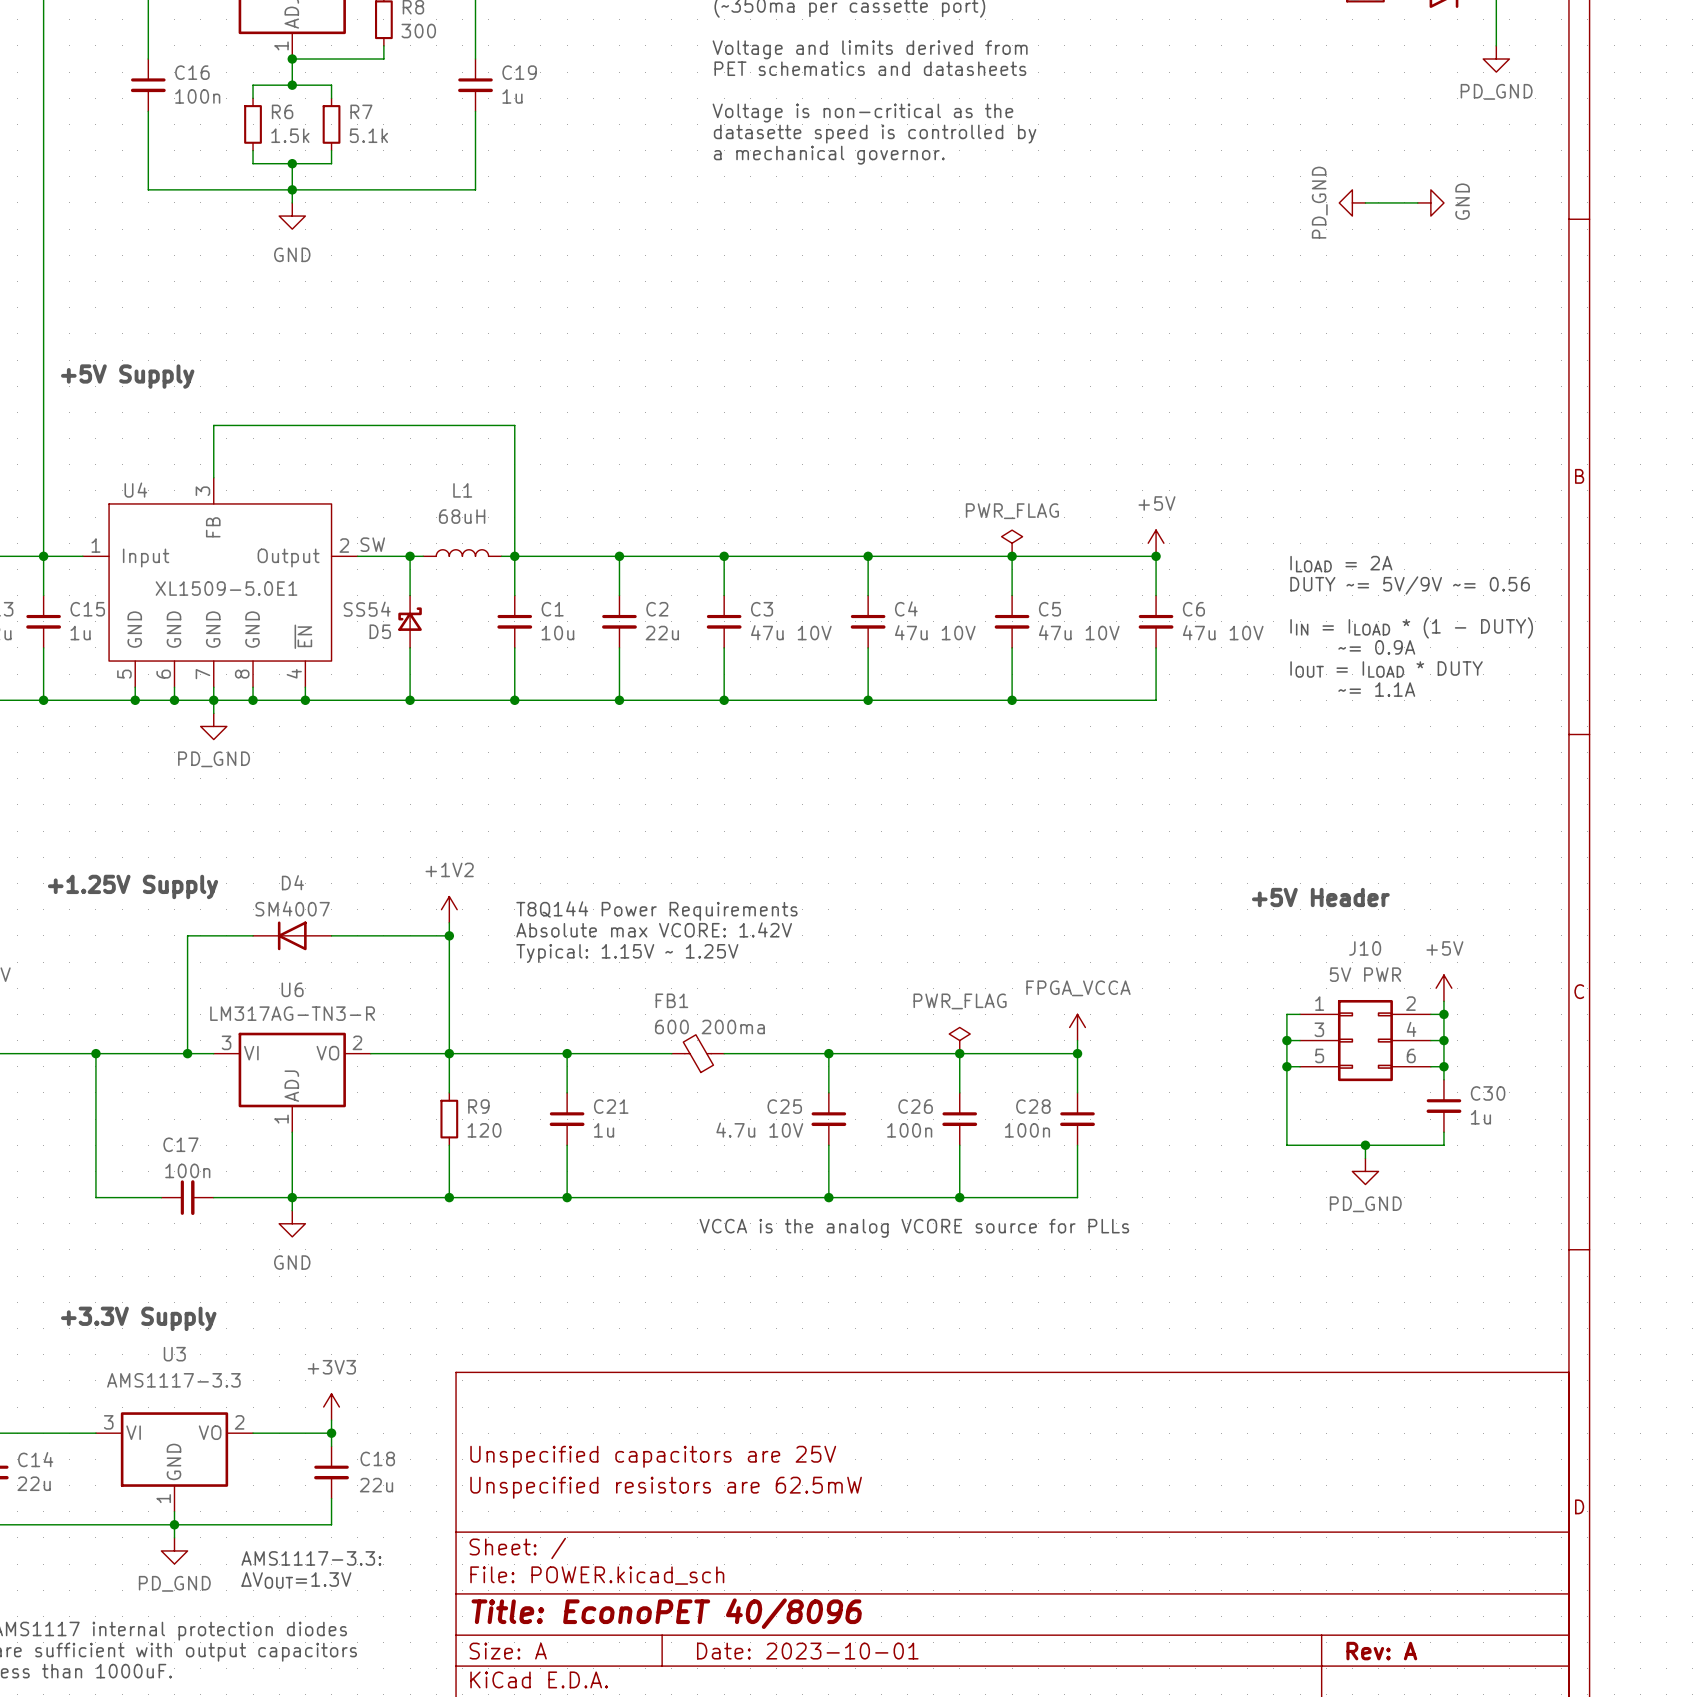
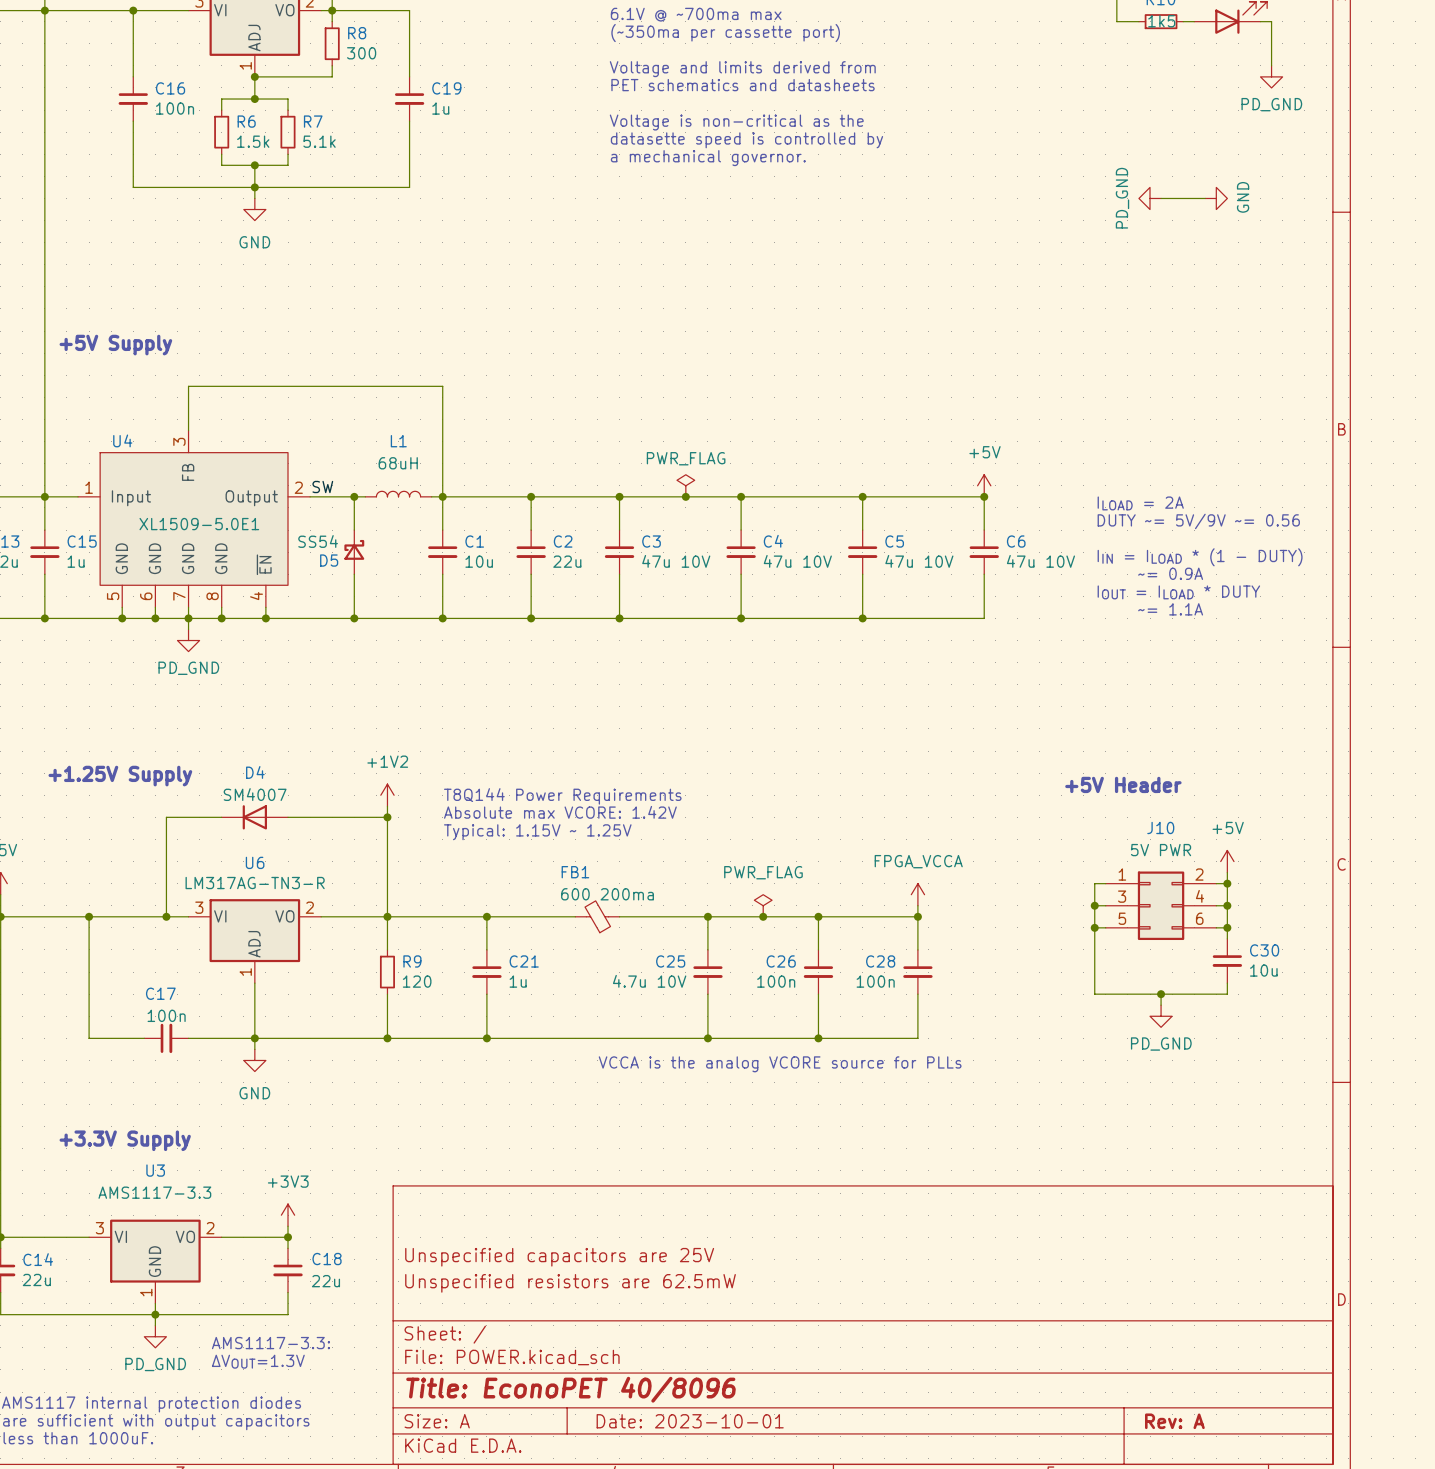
power symbol position: PWR_FLAG (1012, 543) -> PWR_FLAG (685, 485)
junction: none -> (685, 496)
power symbol position: PWR_FLAG (959, 1040) -> PWR_FLAG (763, 905)
junction: none -> (763, 916)
C30 value: 1u (1480, 1117) -> 10u (1263, 970)

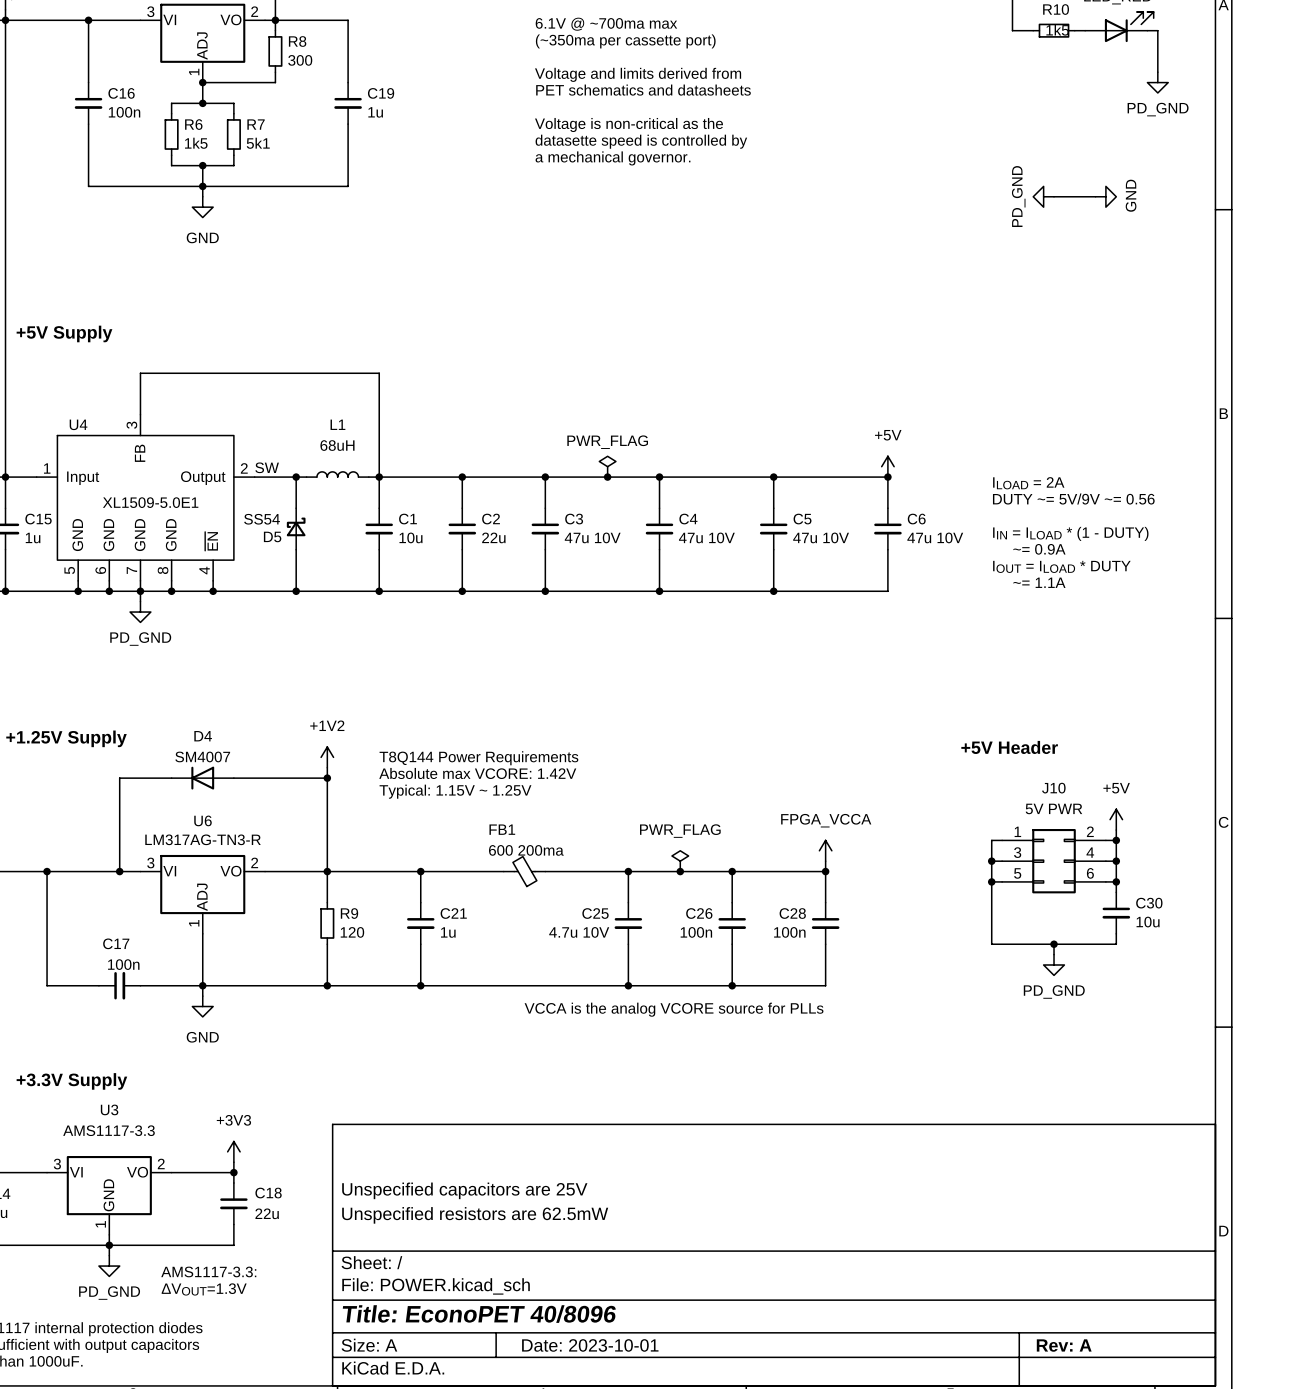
R6 value: 1.5k (253, 141) -> 1k5 (196, 143)
R7 value: 5.1k (319, 141) -> 5k1 (258, 143)

